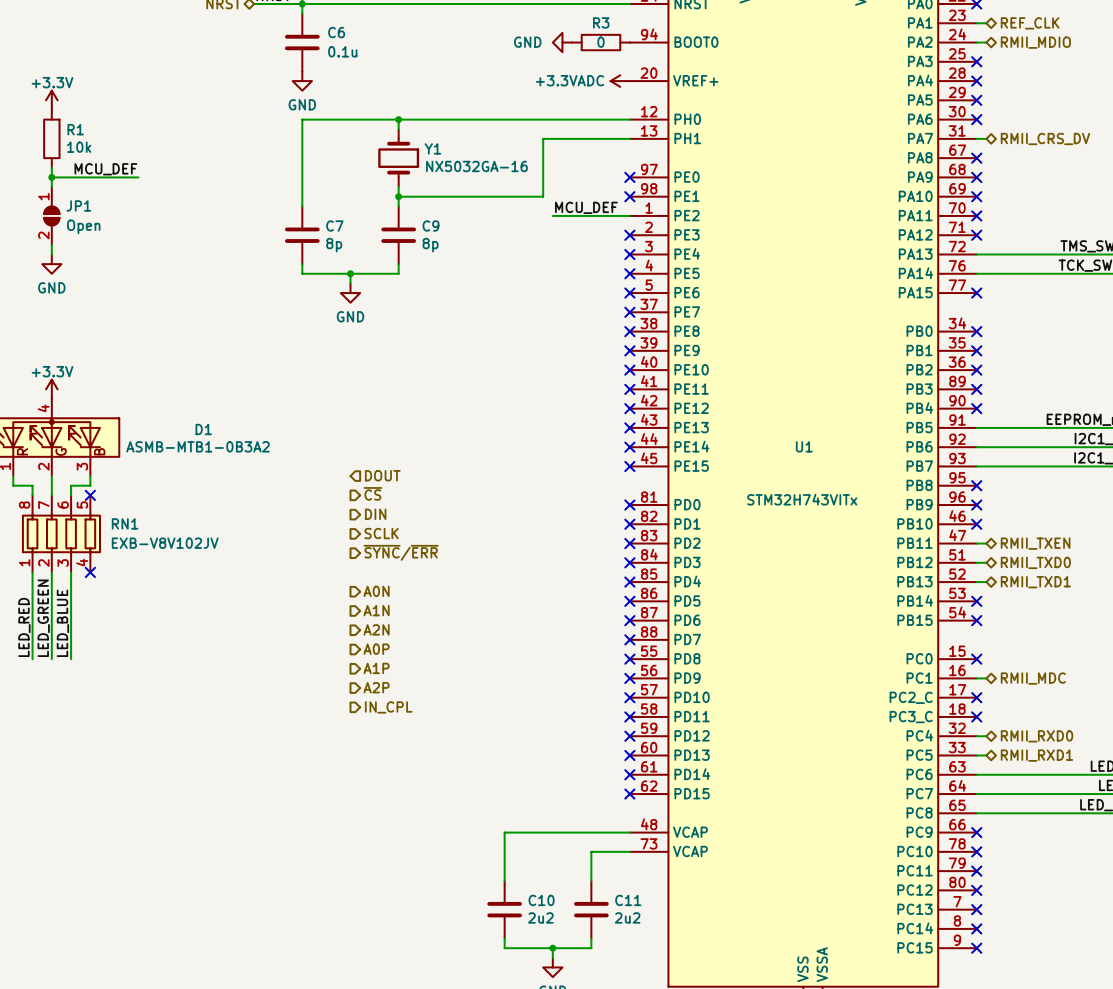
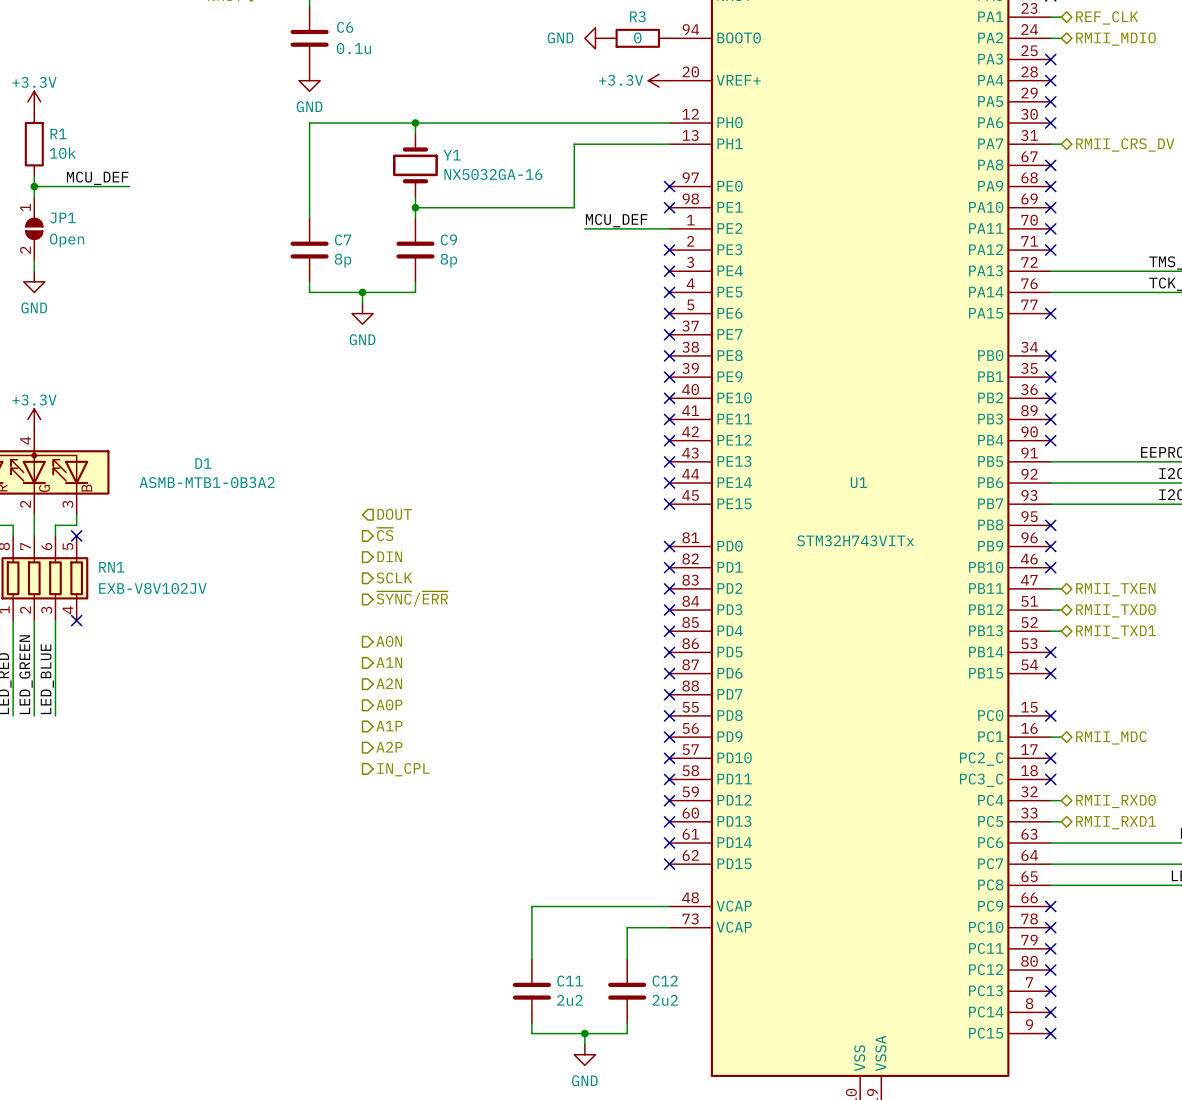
power symbol: +3.3VADC (620, 81) -> +3.3V (658, 80)
C10 name: C10 (541, 900) -> C11 (570, 981)
C11 name: C11 (628, 900) -> C12 (665, 981)

